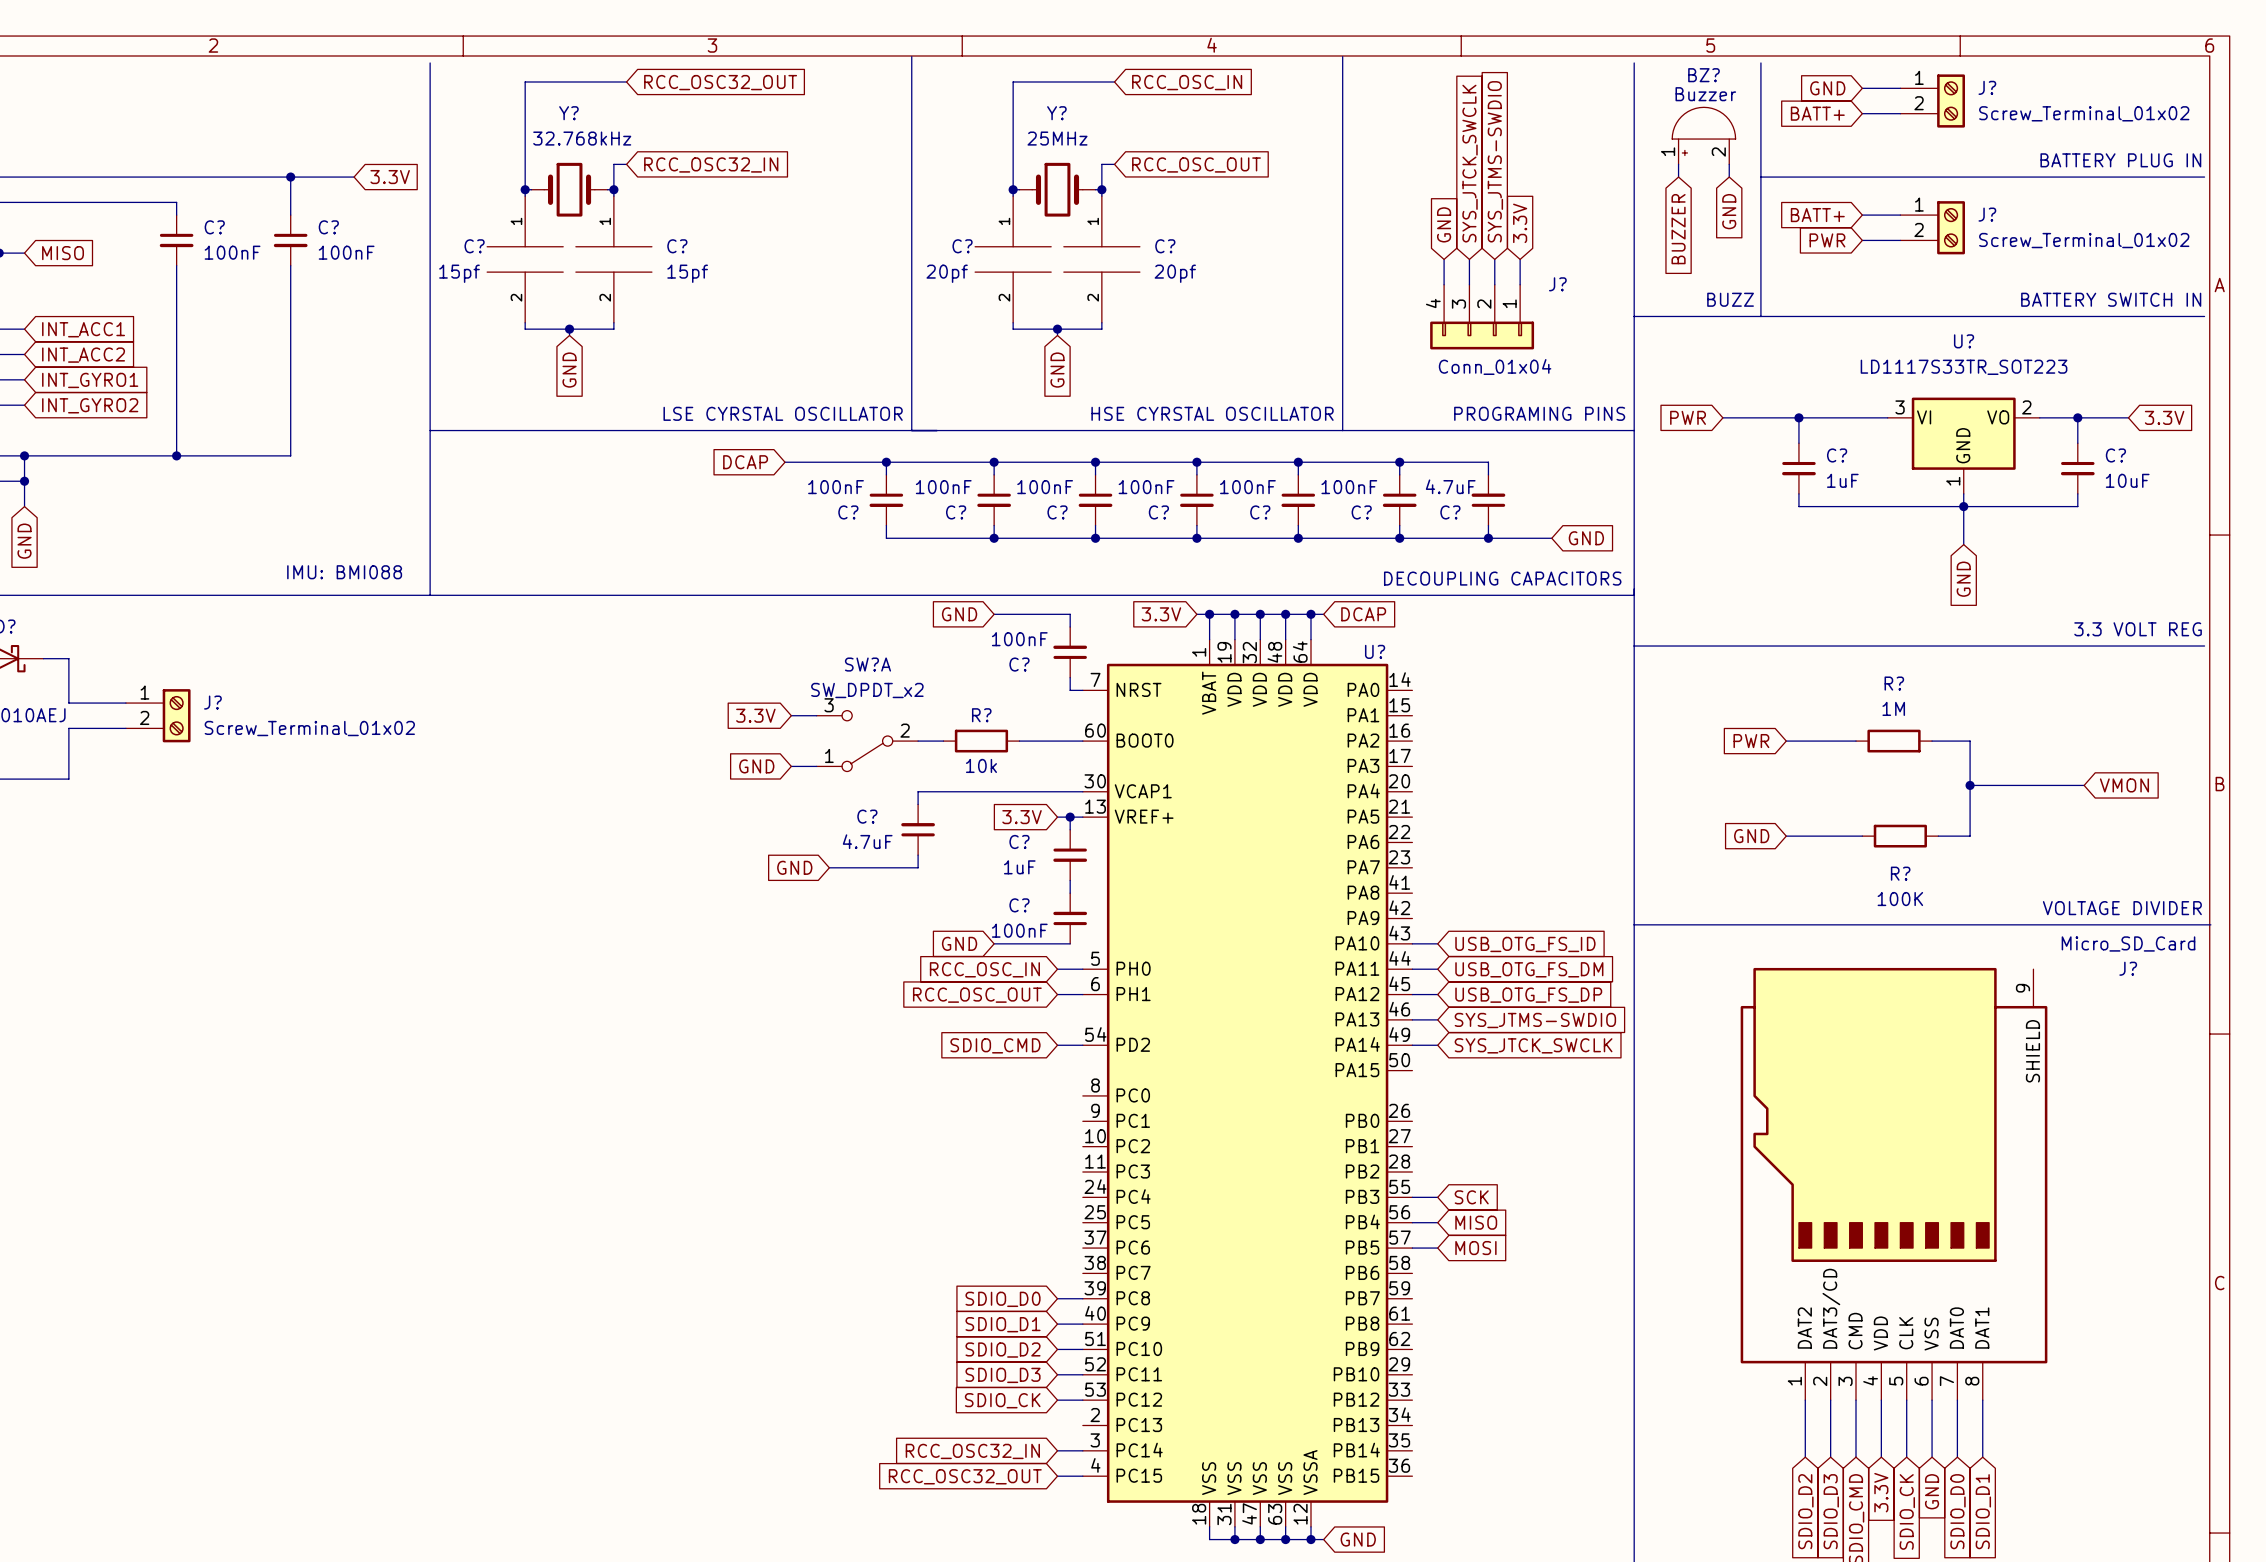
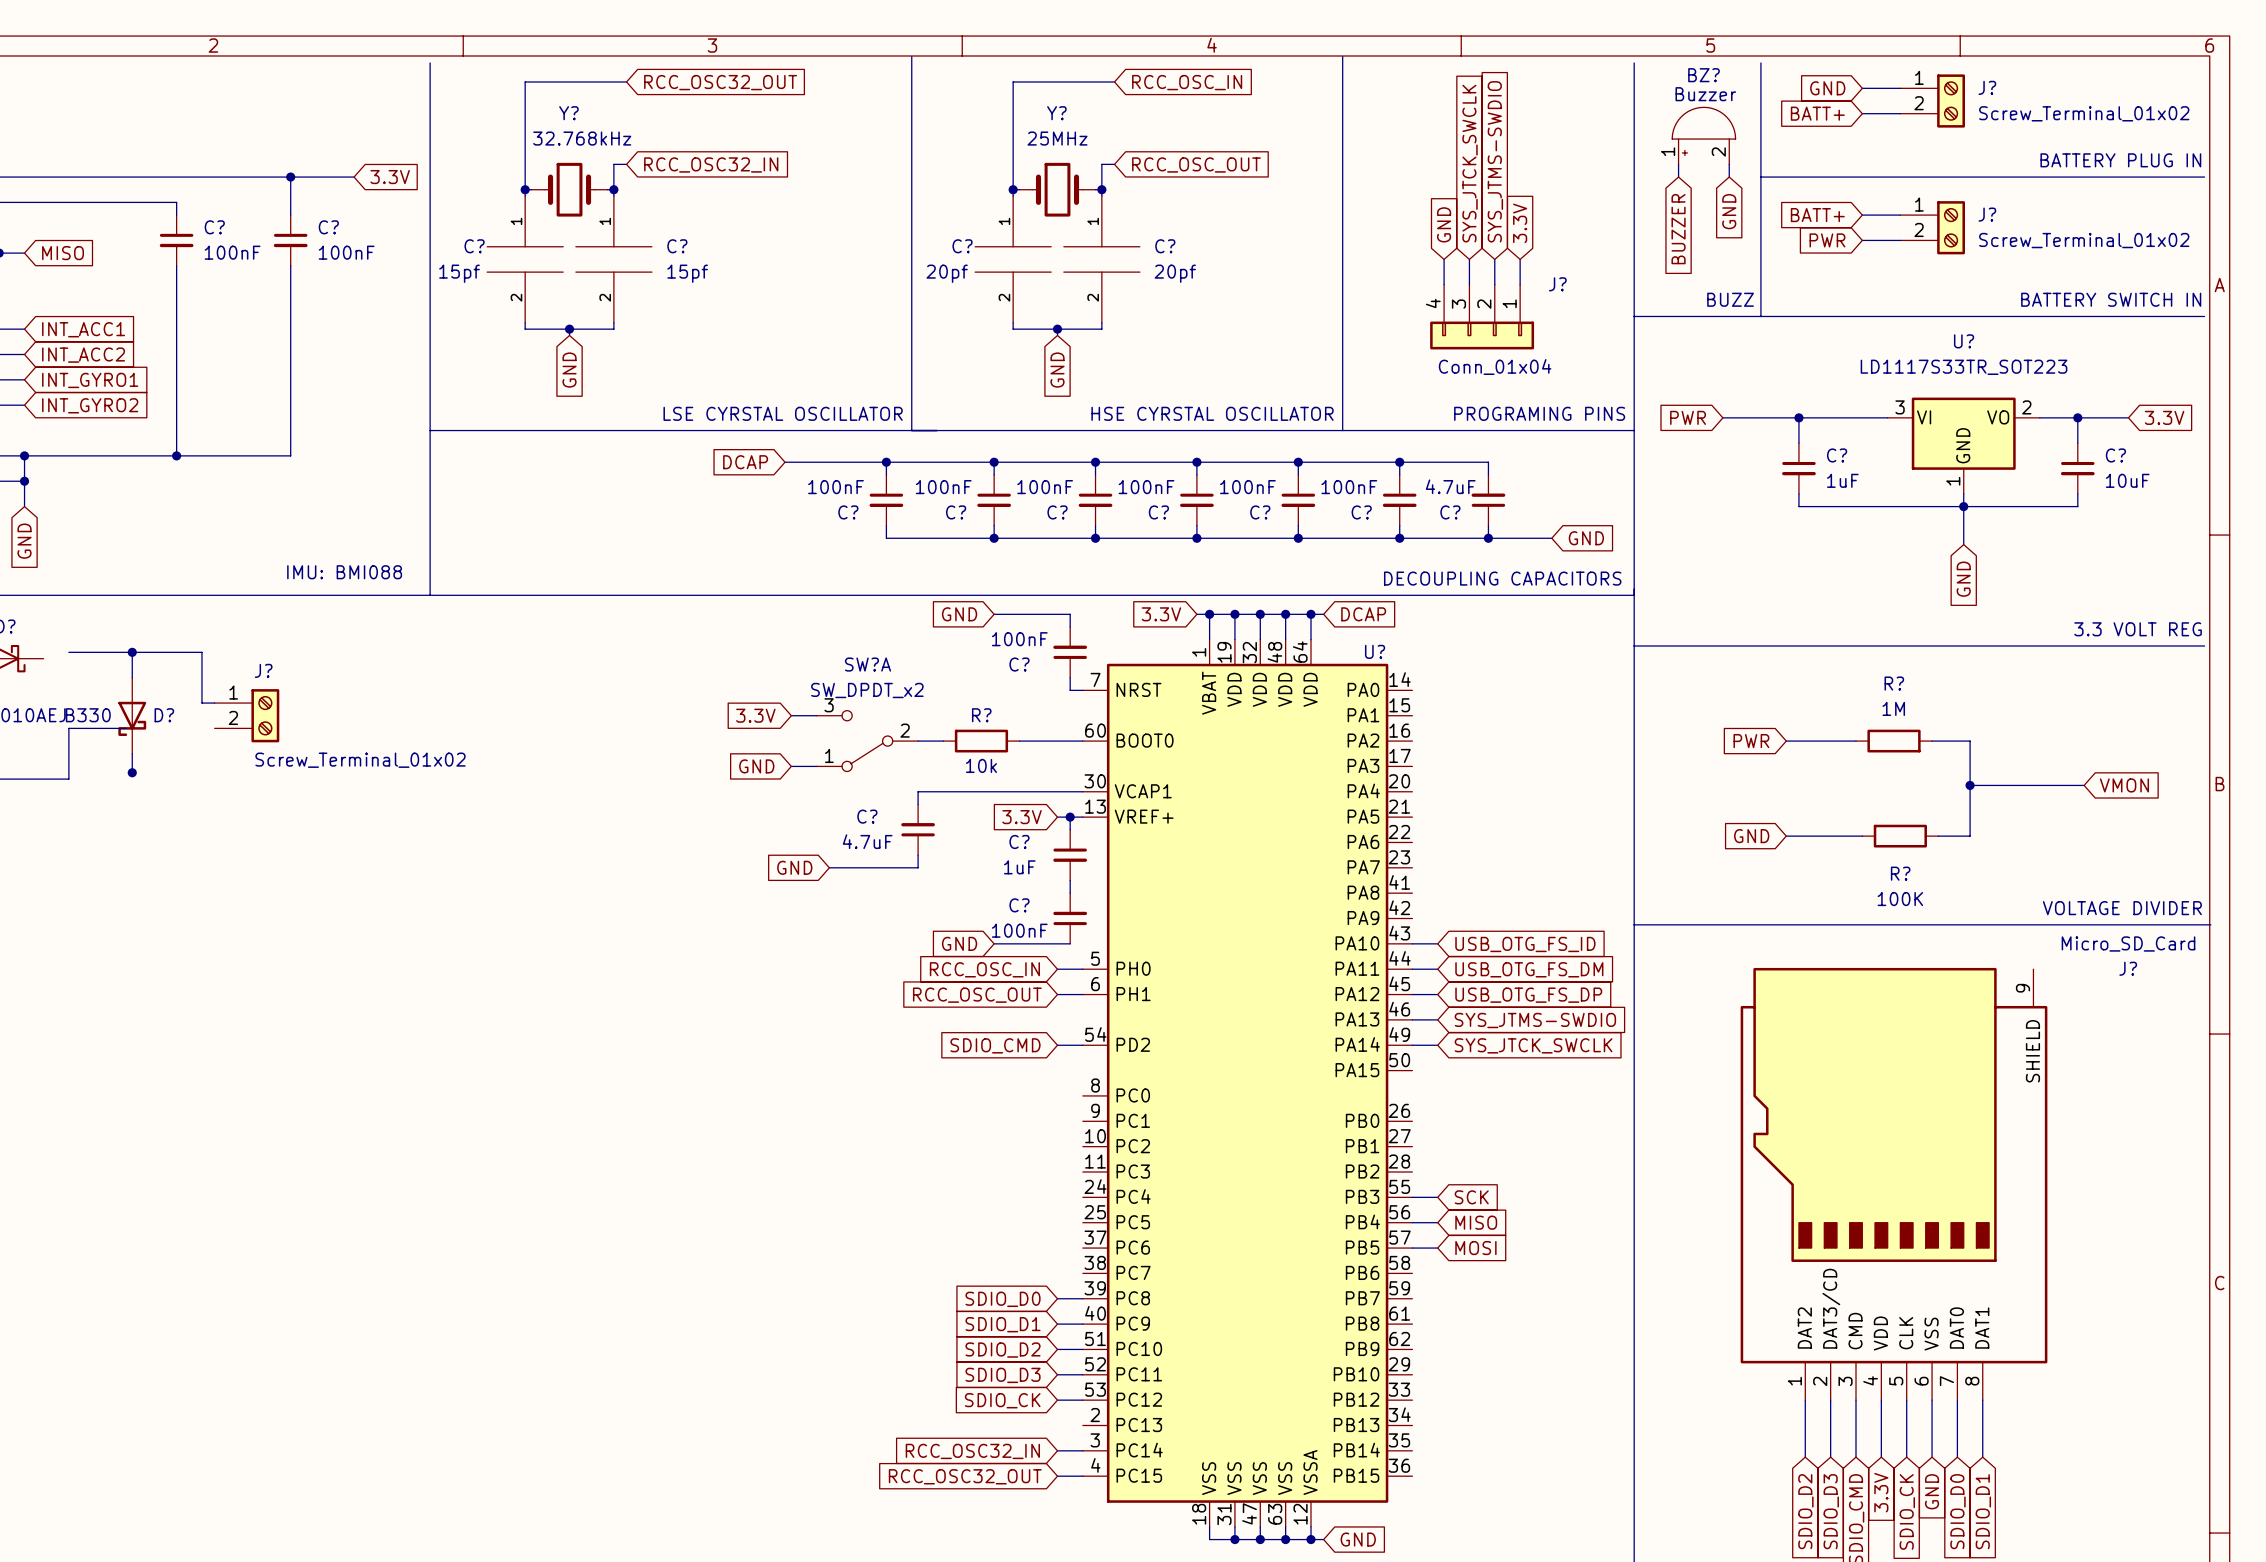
wire: none -> (68, 652) (201, 652) (201, 703) (214, 703)
wire: none -> (132, 652) (132, 677)
junction: none -> (132, 652)
wire: (43, 658) (68, 658) (68, 703) (125, 703) -> none
J? name position: J? (212, 702) -> J? (263, 670)
D?: none -> B330 (132, 715)
J? position: (158, 715) -> (246, 715)
J? value position: Screw_Terminal_01x02 (309, 728) -> Screw_Terminal_01x02 (360, 760)
wire: none -> (132, 753) (132, 772)
junction: none -> (132, 772)

